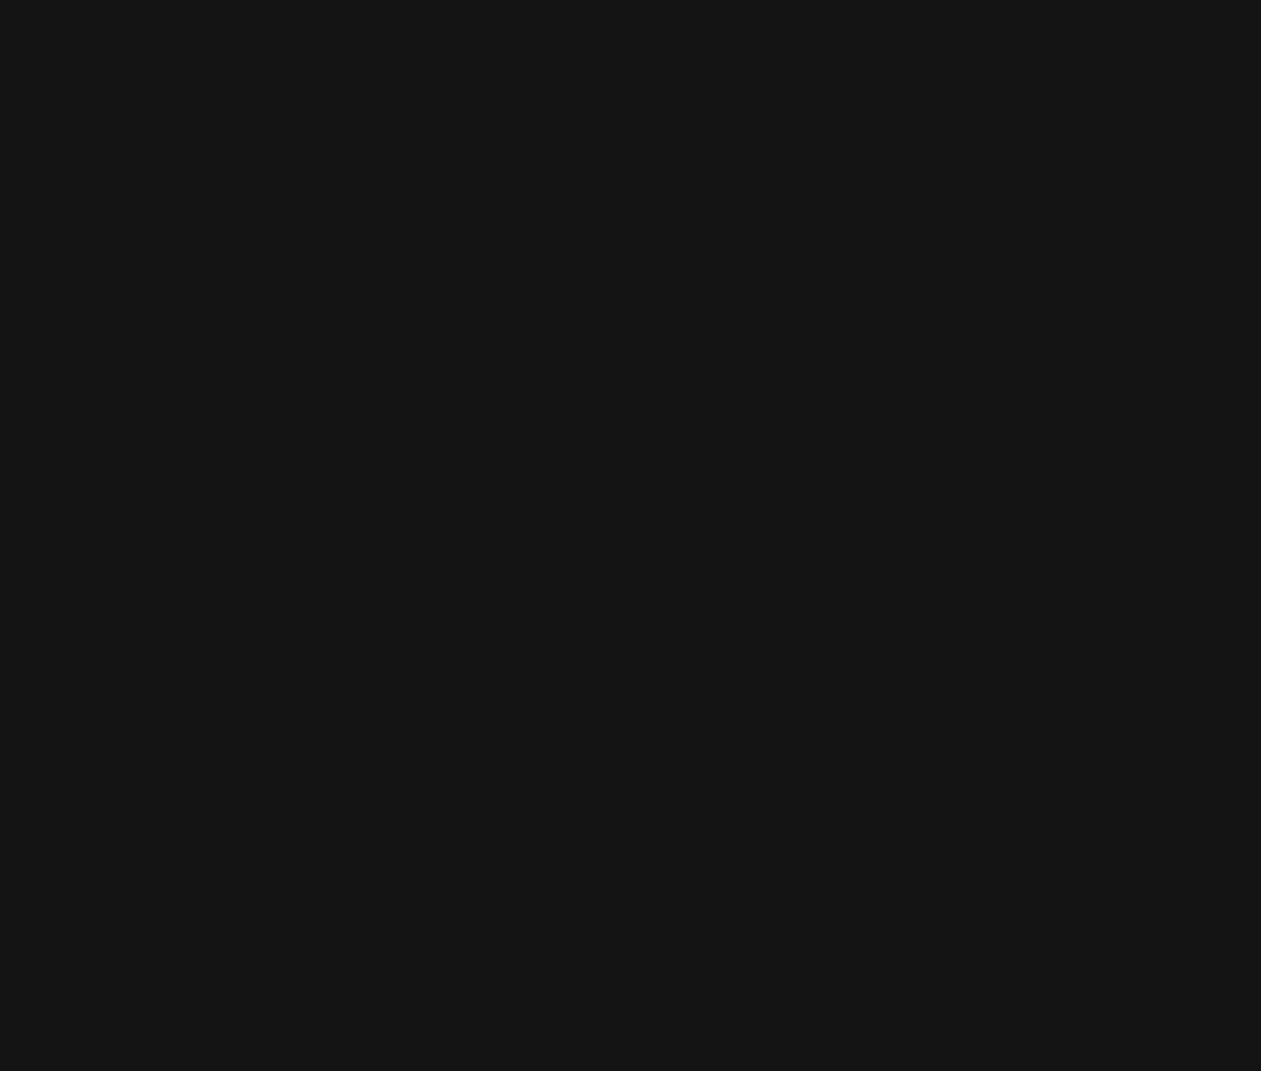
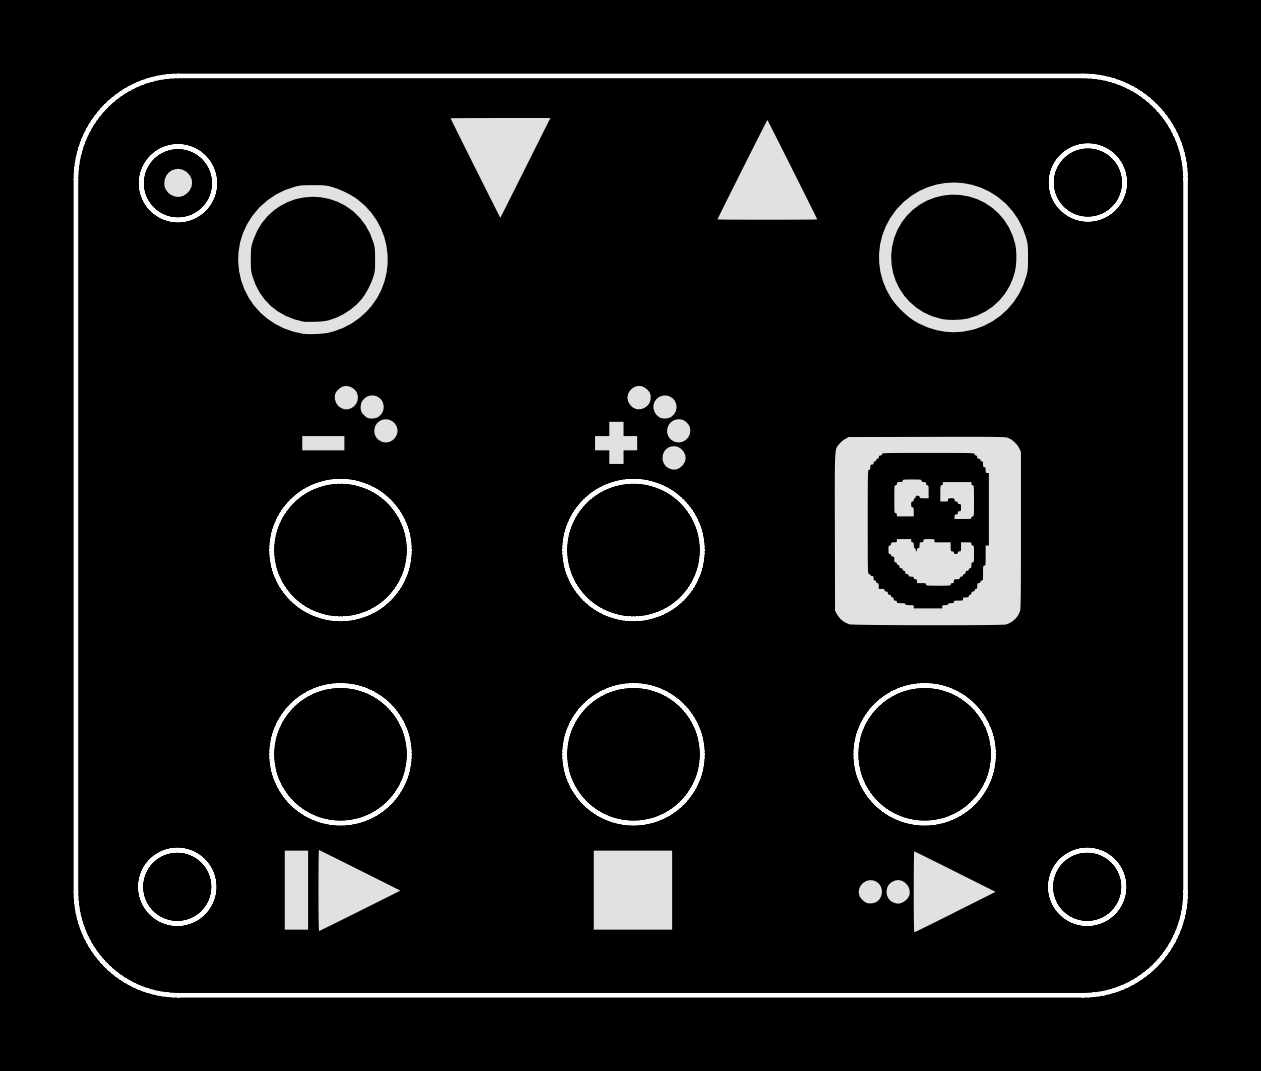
board edge: none -> (178, 75) (162, 77) (143, 82) (125, 90) (109, 102) (96, 117) (86, 134) (79, 153) (76, 168) (76, 897) (79, 917) (86, 936) (96, 953) (109, 968) (138, 987) (157, 993) (173, 995) (1083, 995) (1103, 993) (1123, 987) (1140, 977) (1158, 961) (1177, 932) (1183, 912) (1185, 897) (1185, 179) (1183, 158) (1177, 139) (1168, 121) (1152, 102) (1123, 84) (1103, 78) (1088, 76) (178, 75)
drawing: none -> [164, 118, 1029, 933]
board edge: none -> (1086, 145) (1072, 149) (1060, 157) (1053, 170) (1051, 184) (1054, 198) (1063, 209) (1075, 217) (1089, 219) (1103, 215) (1115, 207) (1122, 194) (1124, 180) (1121, 166) (1112, 155) (1100, 148) (1086, 145)
board edge: none -> (176, 146) (162, 150) (150, 158) (143, 170) (141, 185) (144, 198) (153, 210) (165, 217) (179, 219) (193, 216) (205, 207) (212, 195) (214, 181) (211, 167) (202, 156) (190, 148) (176, 146)
board edge: none -> (337, 481) (311, 487) (289, 503) (275, 526) (271, 553) (278, 579) (294, 601) (317, 614) (343, 618) (369, 612) (391, 596) (405, 573) (409, 546) (402, 520) (386, 499) (363, 485) (337, 481)
board edge: none -> (630, 481) (604, 487) (582, 503) (568, 526) (564, 553) (571, 579) (587, 601) (610, 614) (636, 618) (662, 612) (684, 596) (698, 573) (702, 546) (695, 520) (679, 499) (656, 485) (630, 481)
board edge: none -> (337, 685) (311, 692) (289, 708) (275, 731) (271, 757) (278, 783) (294, 805) (317, 819) (343, 823) (369, 816) (391, 800) (405, 777) (409, 750) (402, 724) (386, 703) (363, 689) (337, 685)
board edge: none -> (630, 685) (604, 692) (582, 708) (568, 731) (564, 757) (571, 783) (587, 805) (610, 819) (636, 823) (662, 816) (684, 800) (698, 777) (702, 750) (695, 724) (679, 703) (656, 689) (630, 685)
board edge: none -> (921, 685) (895, 692) (873, 708) (859, 731) (855, 757) (862, 783) (878, 805) (901, 819) (928, 823) (954, 816) (975, 800) (989, 777) (993, 750) (986, 724) (970, 703) (947, 689) (921, 685)
board edge: none -> (175, 850) (161, 853) (150, 862) (142, 874) (140, 888) (144, 902) (152, 914) (164, 921) (179, 923) (192, 919) (204, 911) (211, 899) (213, 885) (210, 871) (201, 859) (189, 852) (175, 850)
board edge: none -> (1085, 850) (1071, 853) (1060, 862) (1052, 874) (1050, 888) (1054, 902) (1062, 914) (1074, 921) (1089, 923) (1102, 919) (1114, 911) (1121, 899) (1123, 885) (1120, 871) (1111, 859) (1099, 852) (1085, 850)

